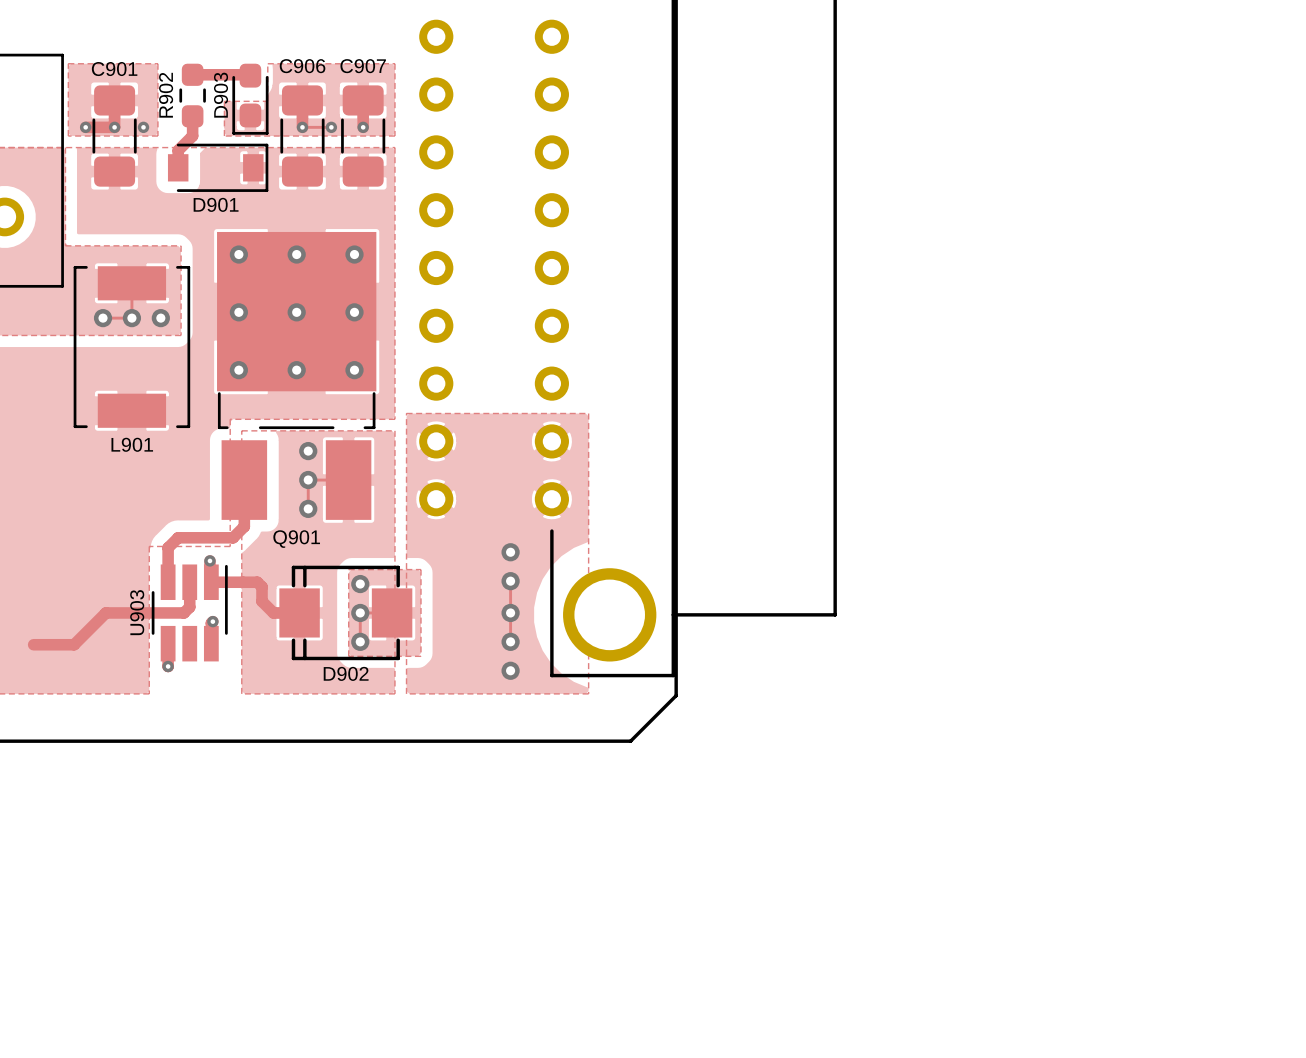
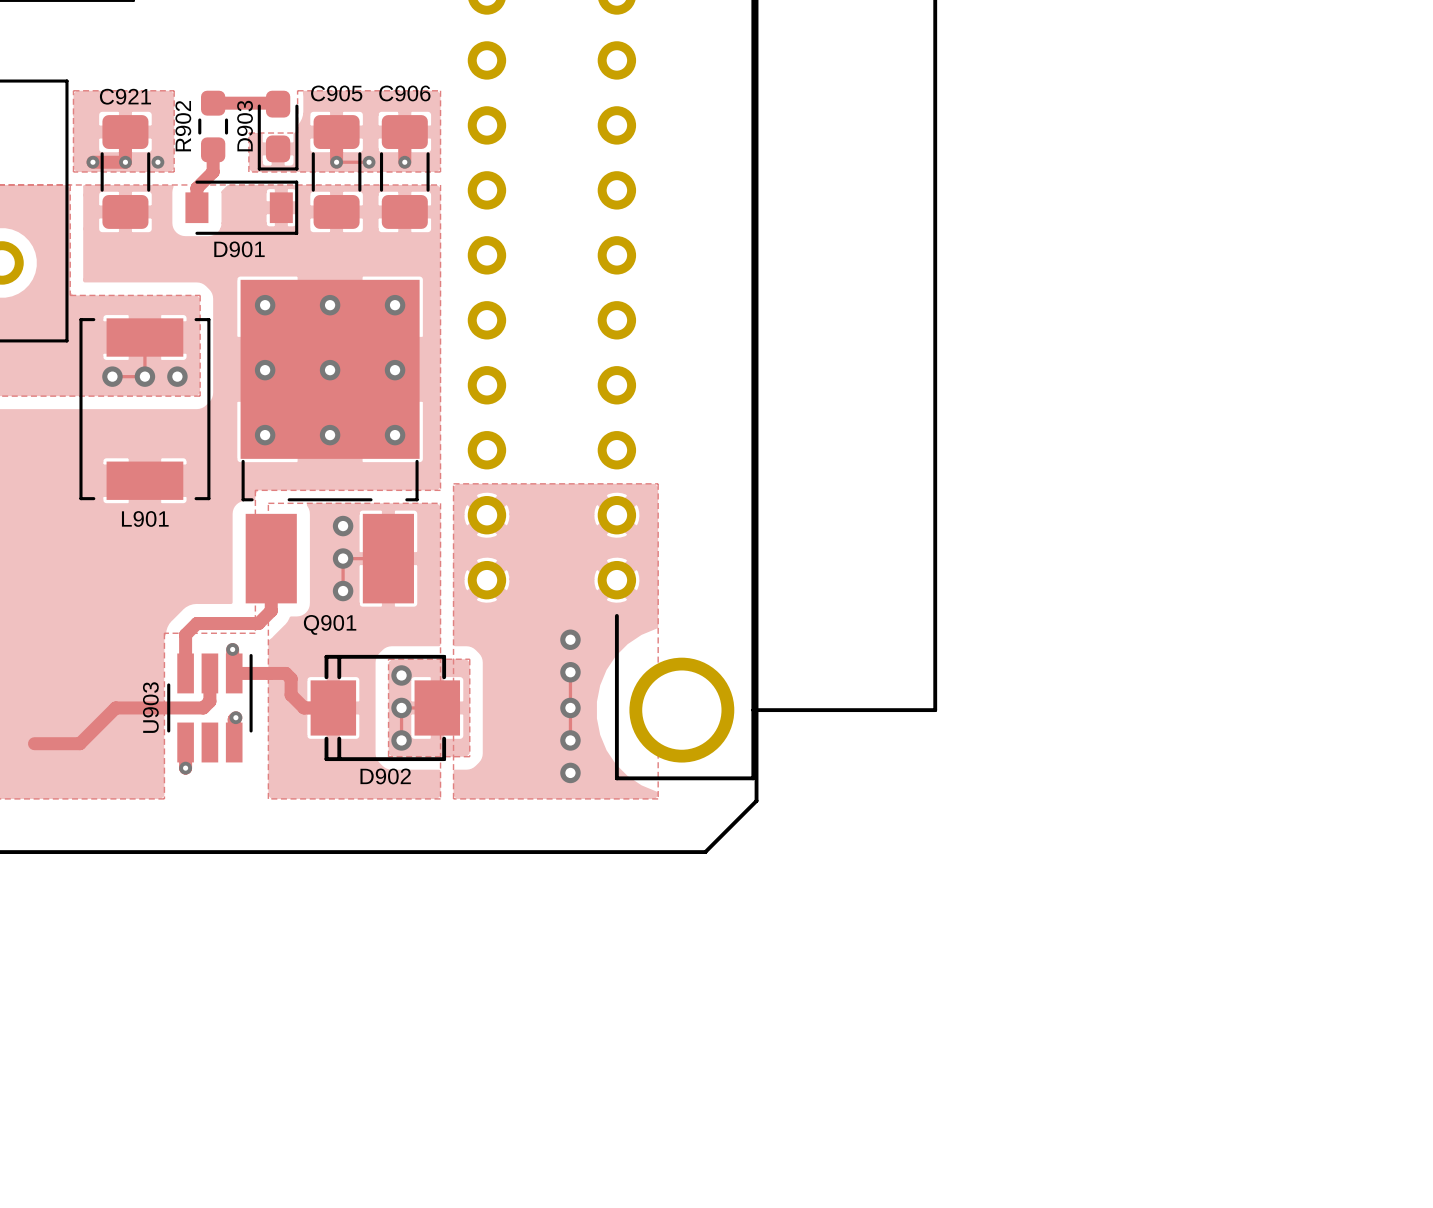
C906 name: C906 (302, 66) -> C905 (336, 93)
C907 name: C907 (363, 66) -> C906 (404, 93)
C901 name: C901 (114, 69) -> C921 (125, 96)

